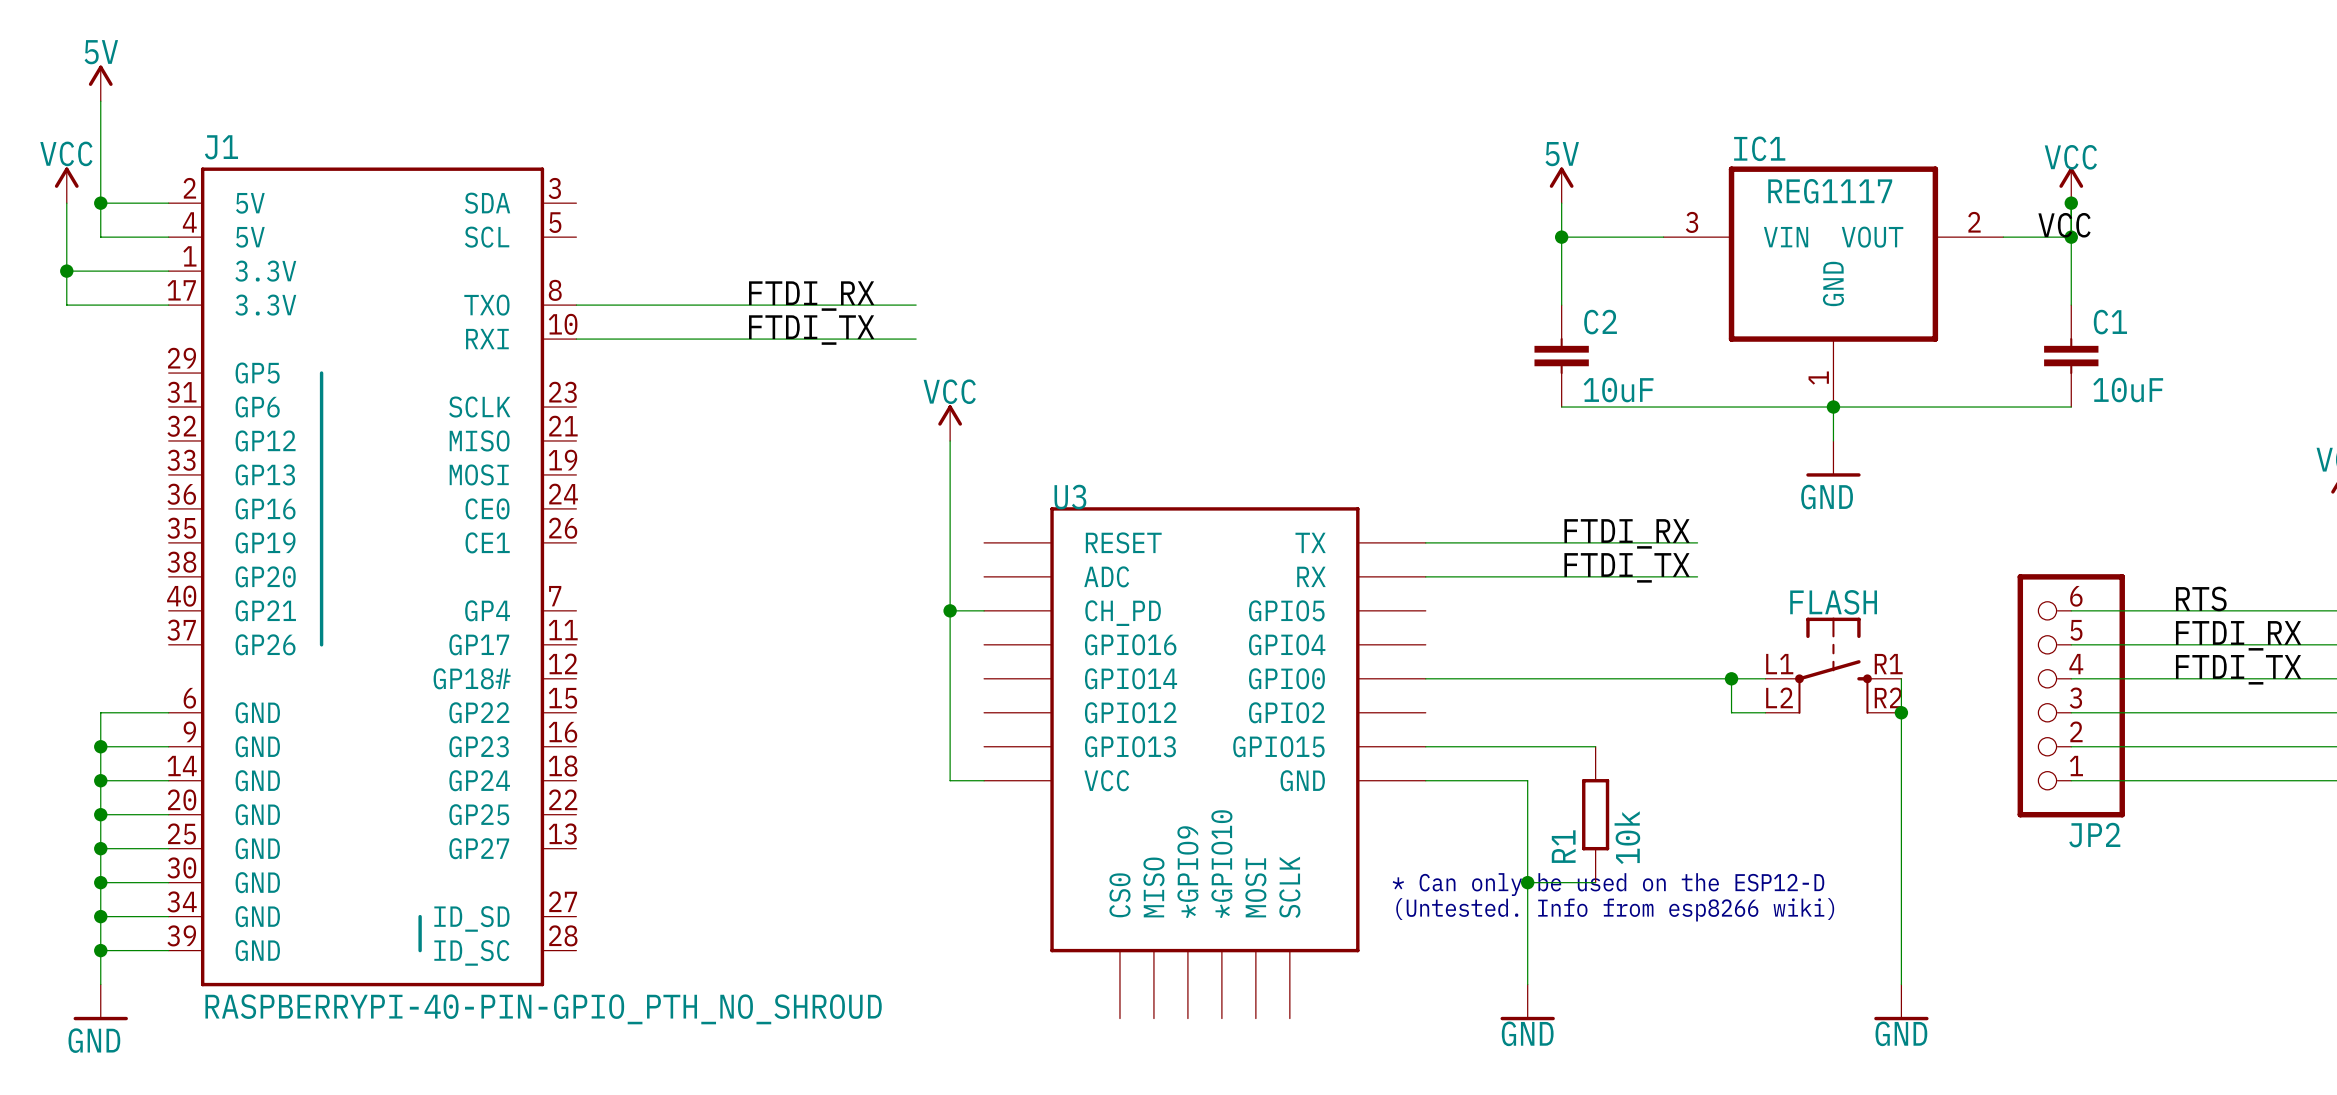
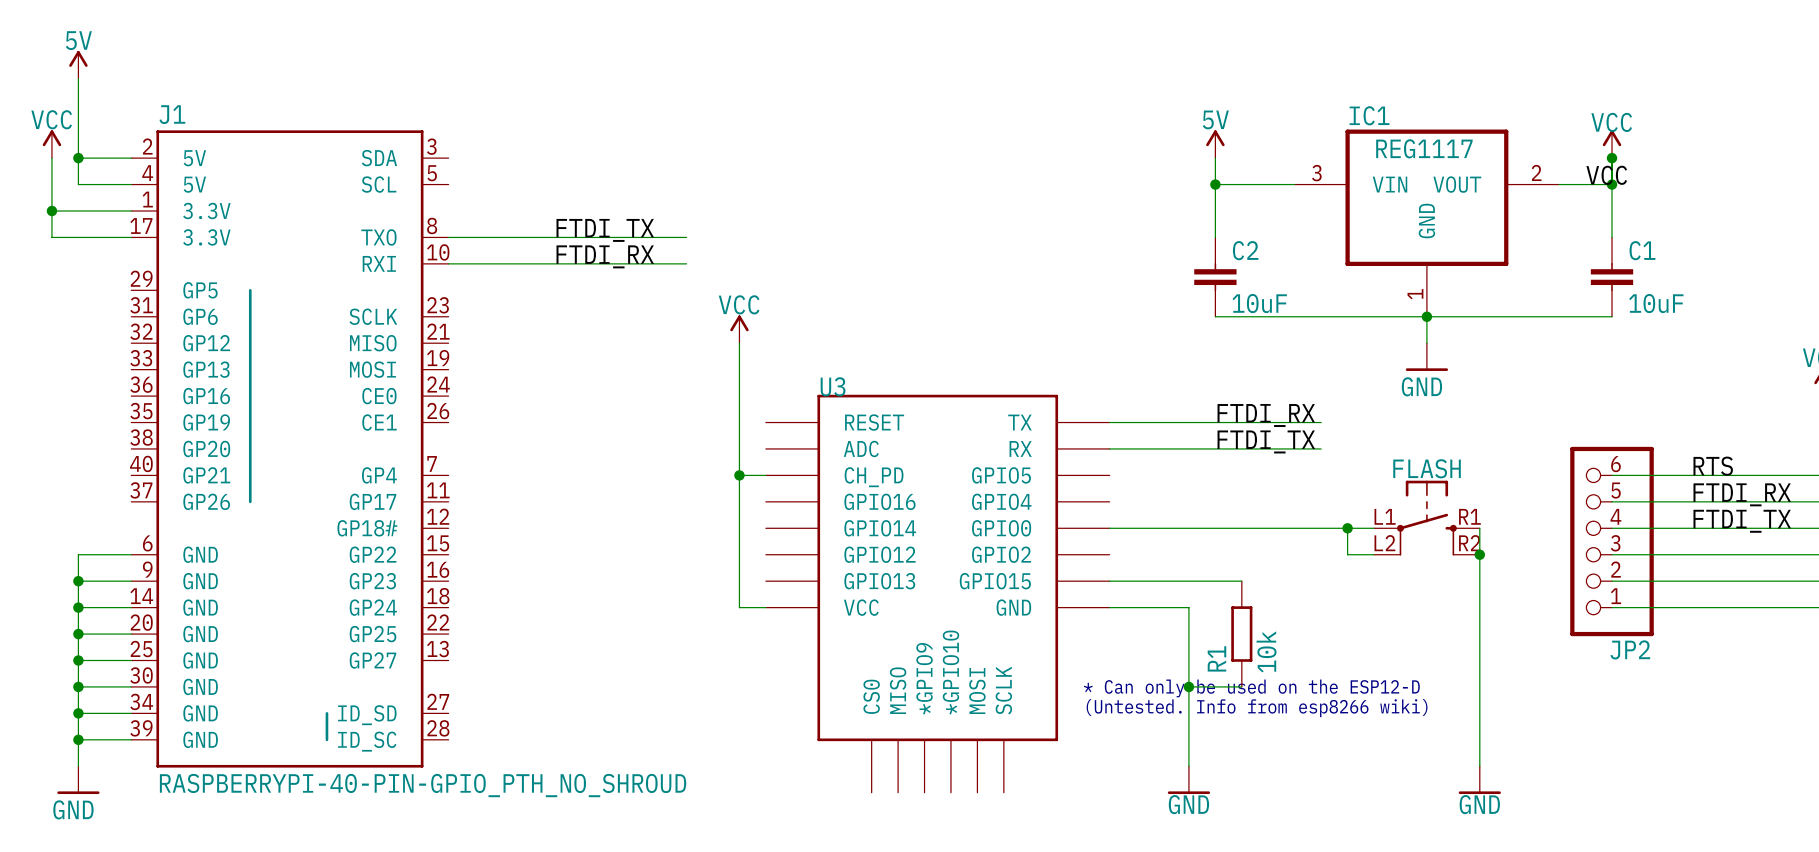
label position: FTDI_RX (811, 296) -> FTDI_RX (605, 256)
wire: (882, 305) (916, 305) -> none
label position: FTDI_TX (811, 330) -> FTDI_TX (605, 230)
wire: (882, 339) (916, 339) -> none

